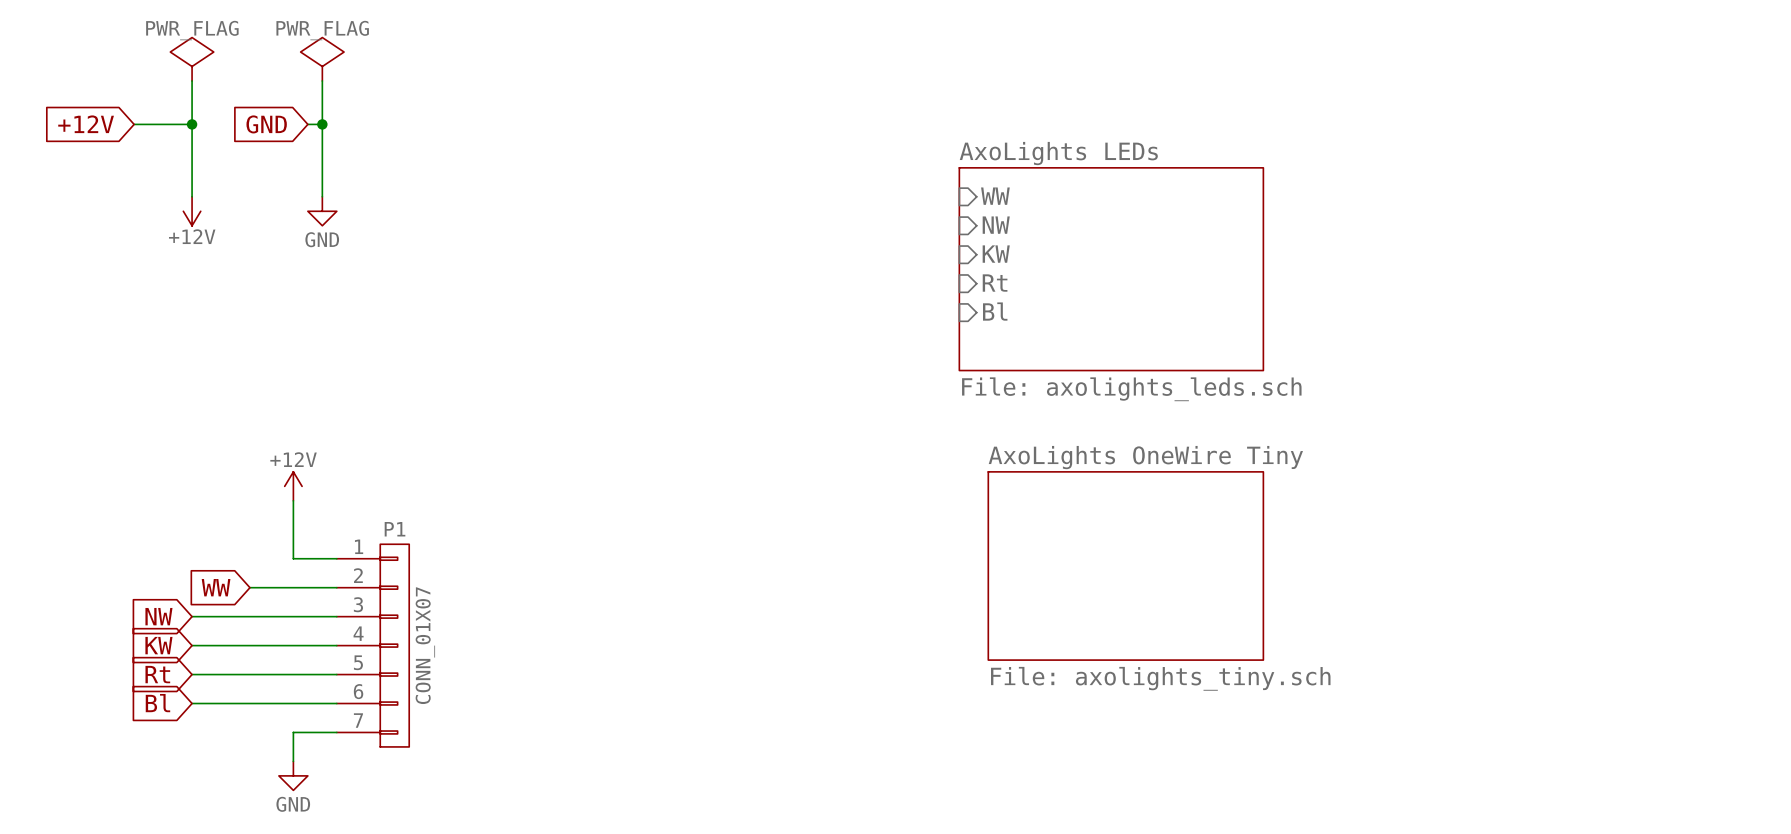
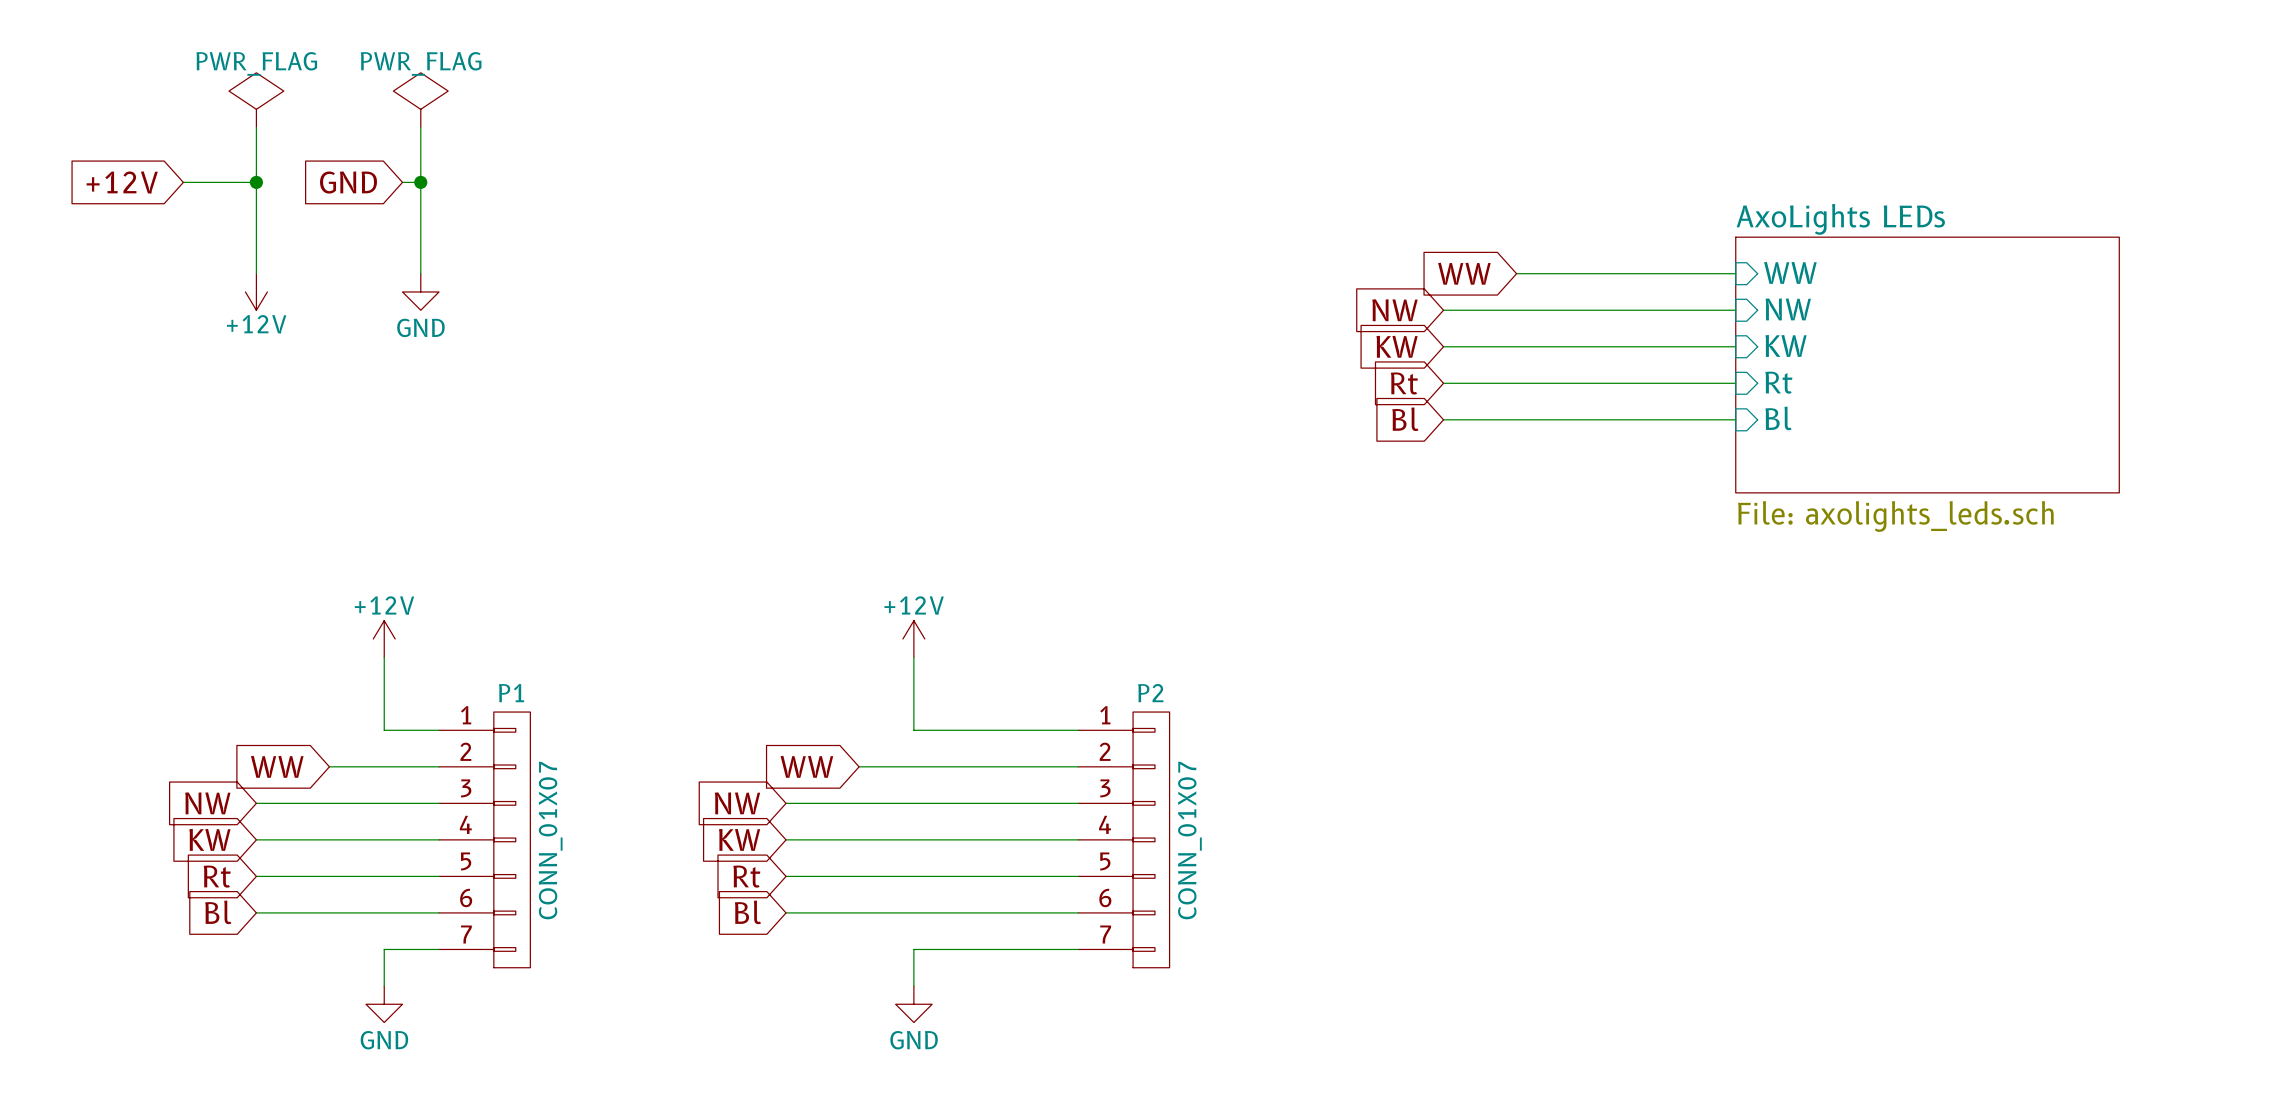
sheet pin: WW (995, 196) -> none
global label: none -> WW (1464, 273)
wire: none -> (1516, 273) (1735, 273)
sheet pin: none -> WW (1790, 272)
sheet pin: NW (996, 225) -> none
global label: none -> NW (1394, 310)
wire: none -> (1443, 310) (1735, 310)
sheet pin: none -> NW (1788, 309)
sheet pin: KW (996, 254) -> none
global label: none -> KW (1397, 346)
wire: none -> (1443, 346) (1735, 346)
sheet pin: none -> KW (1786, 345)
sheet AxoLights LEDs: File: axolights_leds.sch (1111, 269) -> none
sheet AxoLights LEDs: none -> File: axolights_leds.sch (1927, 365)
sheet pin: Rt (995, 283) -> none
global label: none -> Rt (1404, 383)
wire: none -> (1443, 383) (1735, 383)
sheet pin: none -> Rt (1778, 382)
sheet pin: Bl (995, 311) -> none
sheet pin: none -> Bl (1778, 418)
global label: none -> Bl (1405, 419)
wire: none -> (1443, 419) (1735, 419)
power symbol: none -> +12V (913, 638)
wire: none -> (913, 657) (913, 730) (1078, 730)
sheet AxoLights OneWire Tiny: File: axolights_tiny.sch (1125, 565) -> none
global label: none -> WW (806, 766)
wire: none -> (859, 766) (1078, 766)
global label: none -> NW (737, 803)
wire: none -> (786, 803) (1078, 803)
global label: none -> KW (739, 839)
wire: none -> (786, 839) (1078, 839)
P2: none -> CONN_01X07 (1123, 839)
global label: none -> Rt (746, 876)
wire: none -> (786, 876) (1078, 876)
global label: none -> Bl (747, 912)
wire: none -> (786, 912) (1078, 912)
wire: none -> (1078, 949) (913, 949) (913, 985)
power symbol: none -> GND (913, 1004)

